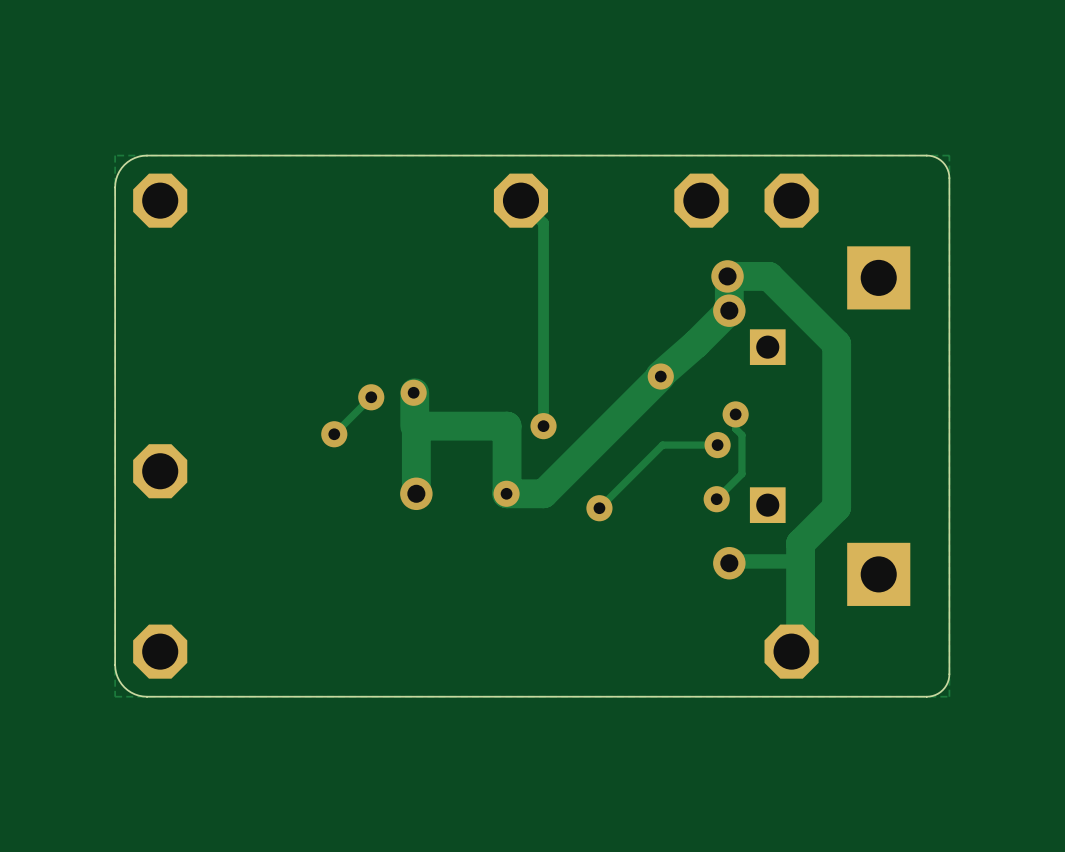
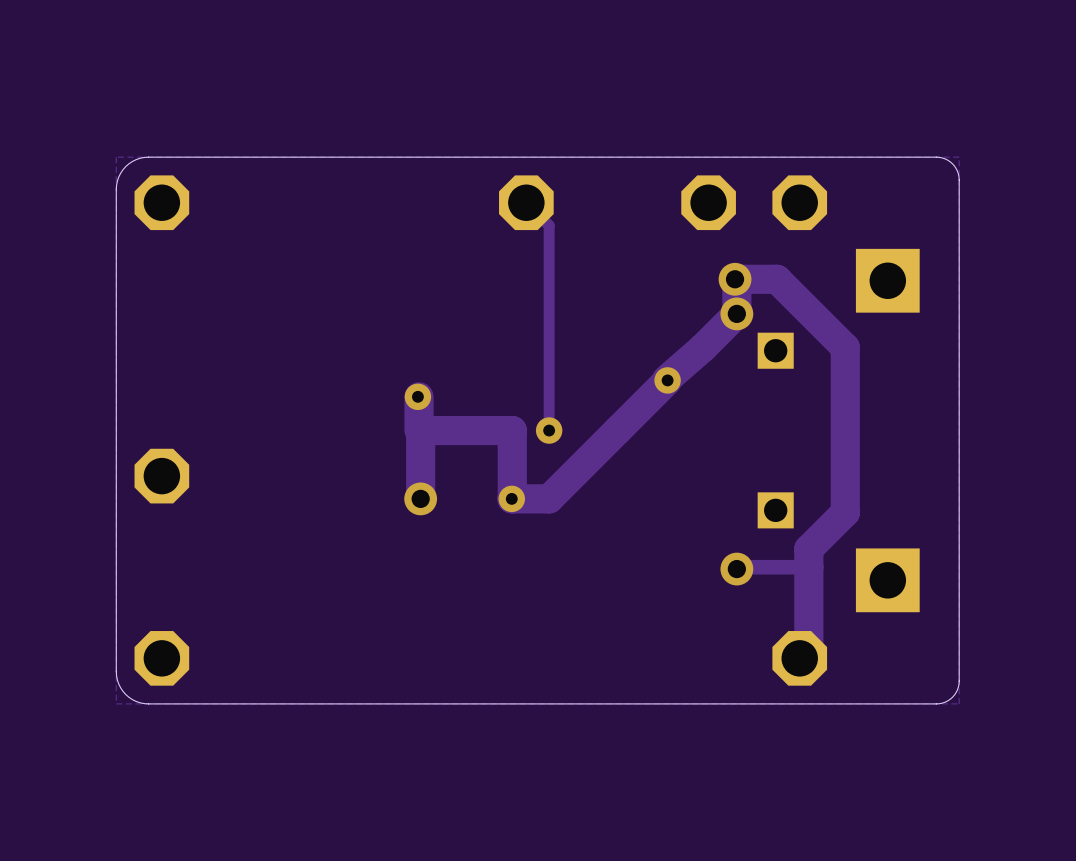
track: (371, 397) (334, 434) -> none
via: (371, 397) -> none
track: (735, 414) (735, 428) (741, 435) (741, 473) (716, 499) -> none
via: (735, 414) -> none
via: (334, 434) -> none
track: (717, 445) (662, 445) (599, 508) -> none
via: (717, 445) -> none
via: (716, 499) -> none
via: (599, 508) -> none

